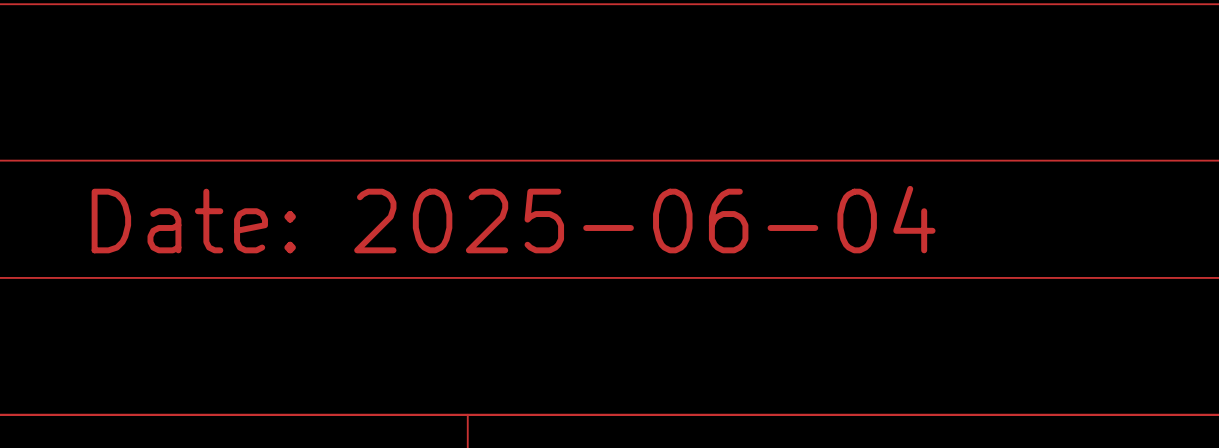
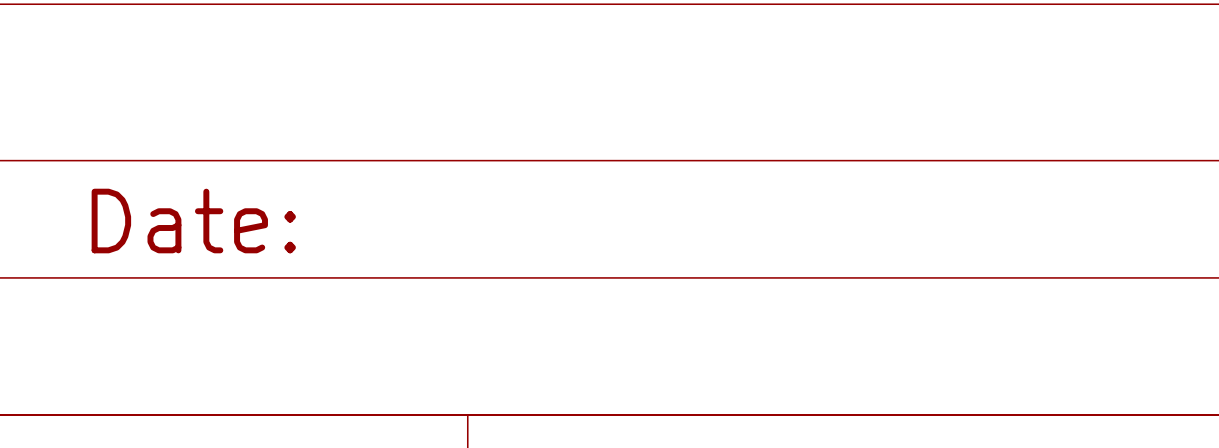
title block: Date: 2025-06-04 (513, 219) -> Date: (193, 221)

